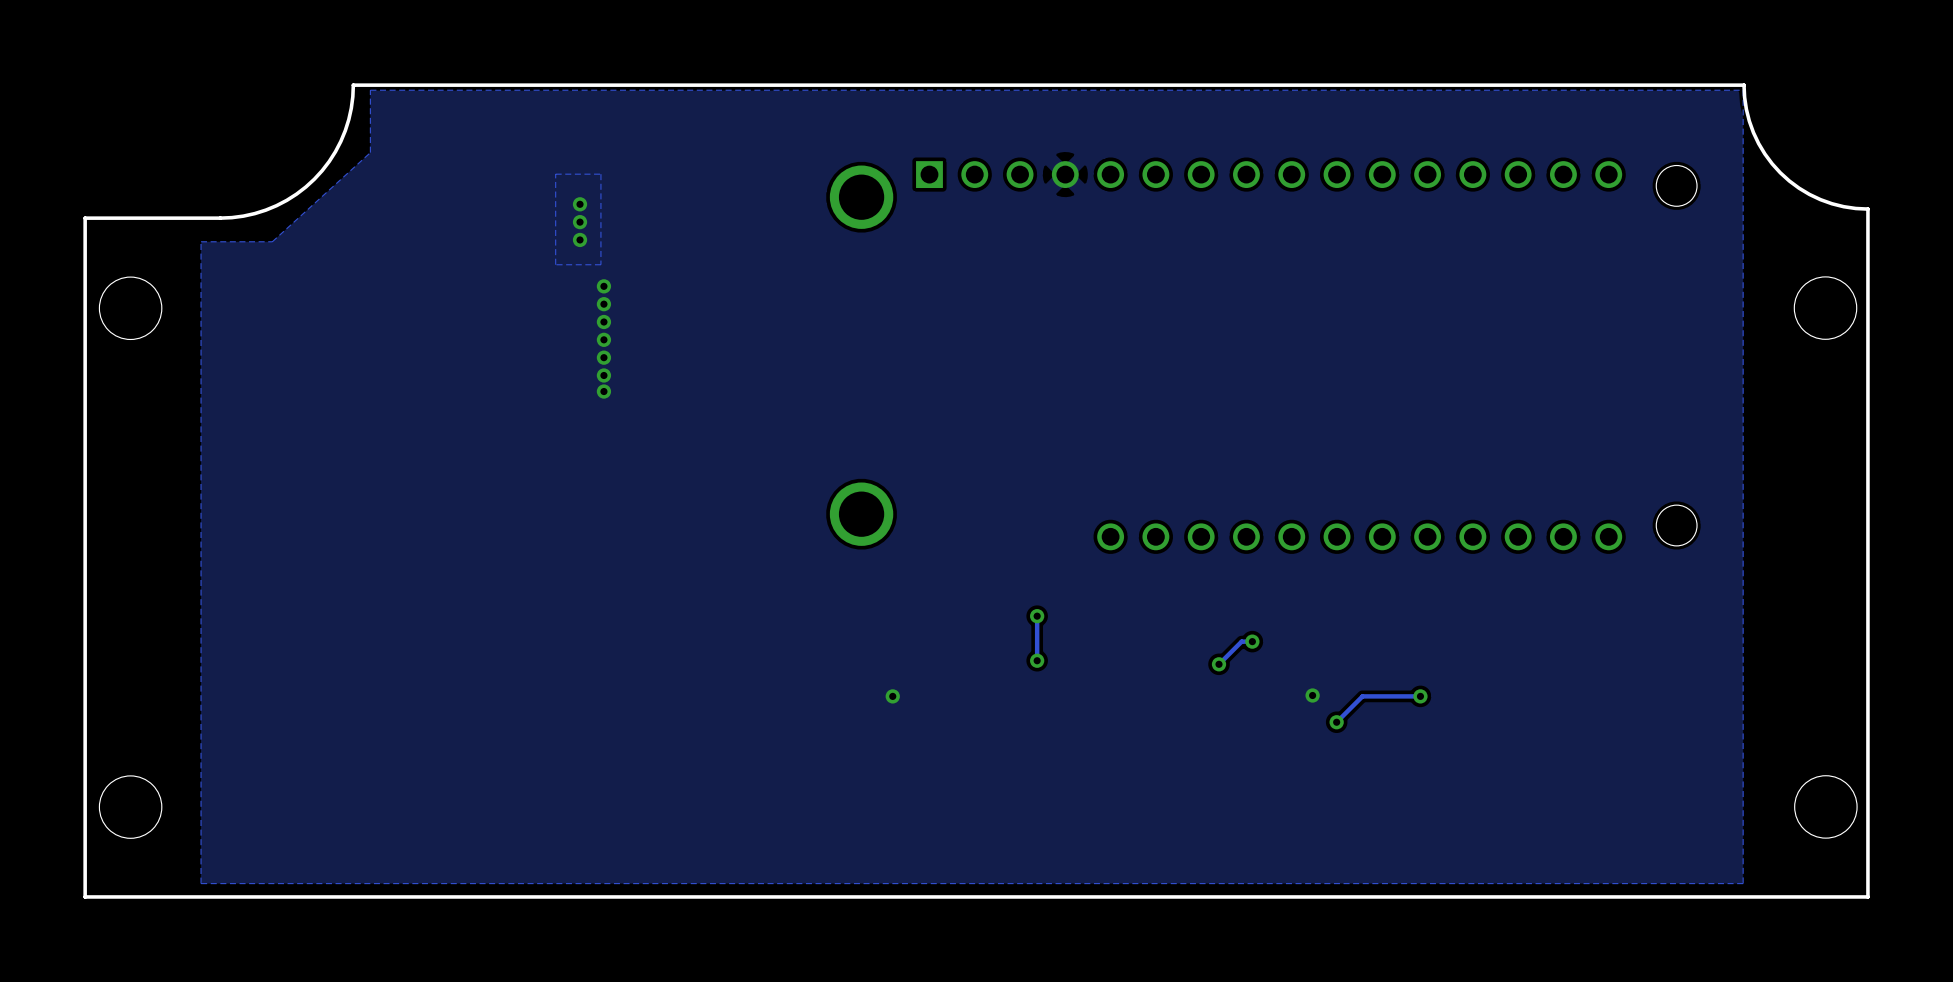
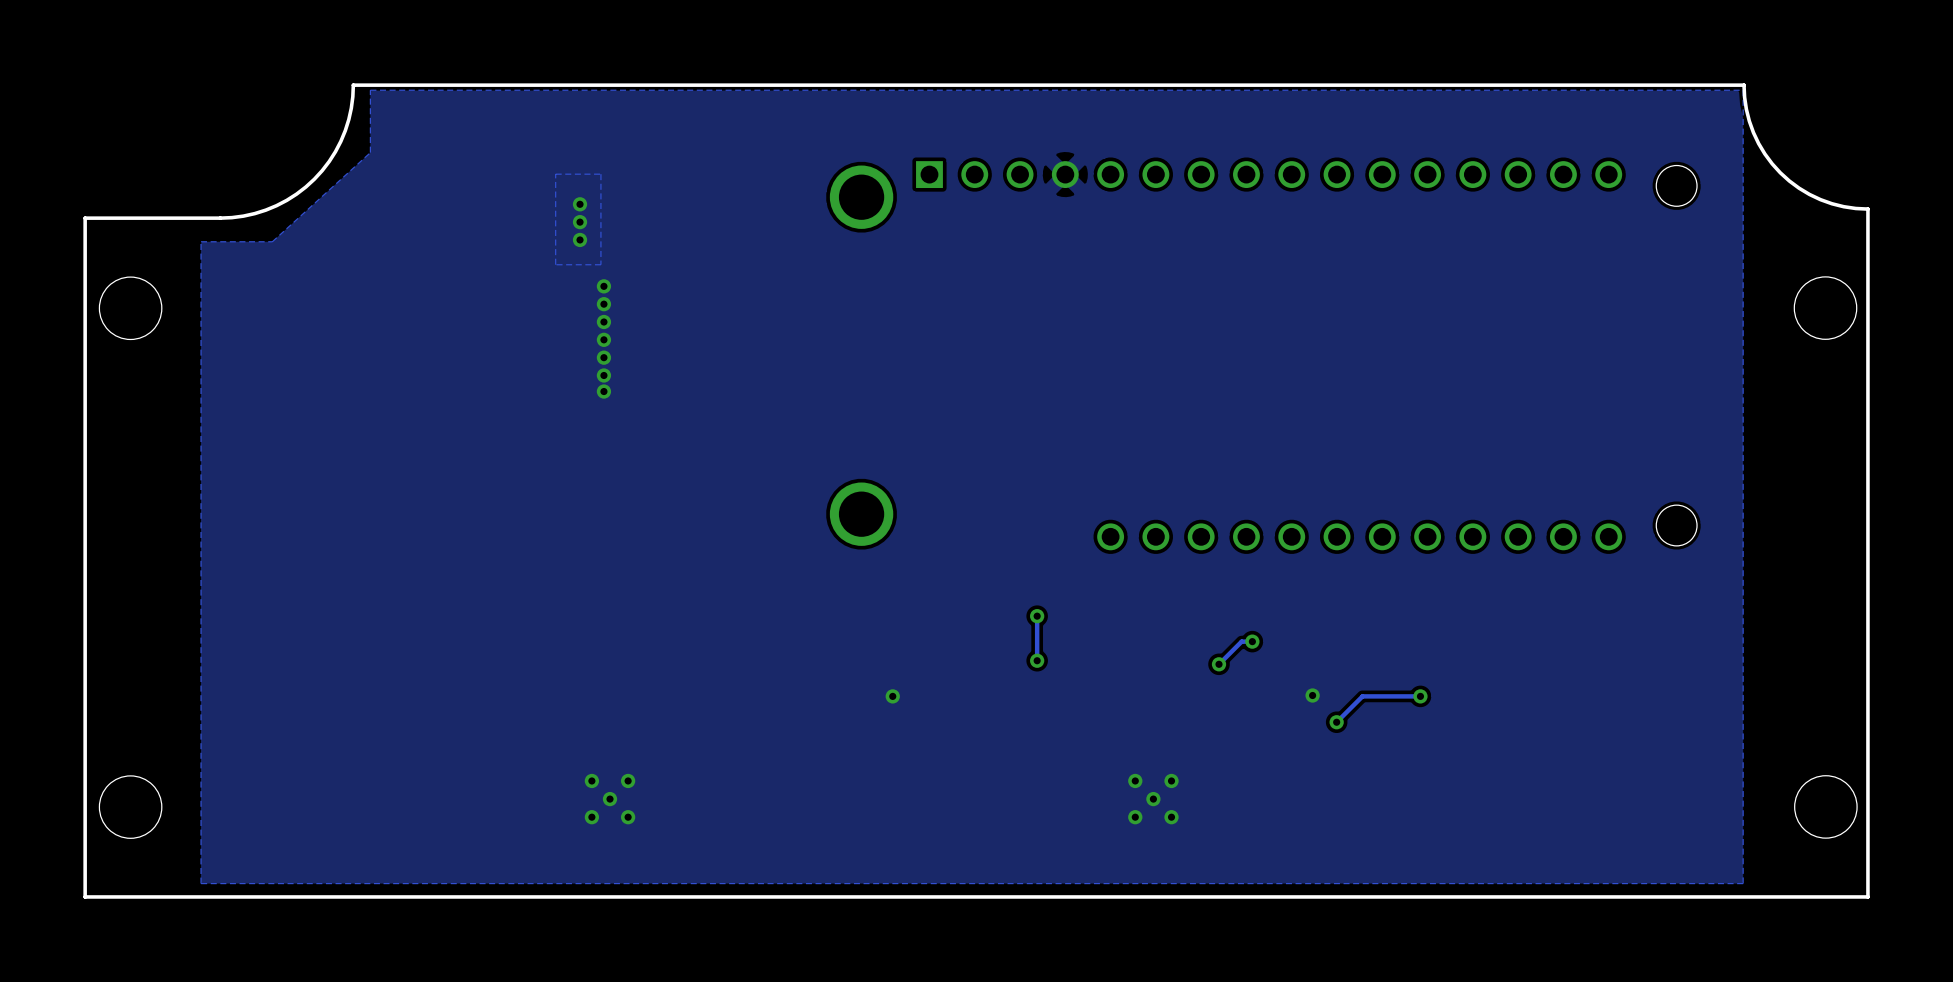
via: none -> (591, 780)
via: none -> (628, 780)
via: none -> (1135, 780)
via: none -> (1171, 780)
via: none -> (610, 799)
via: none -> (1153, 799)
via: none -> (591, 817)
via: none -> (628, 817)
via: none -> (1135, 817)
via: none -> (1171, 817)

